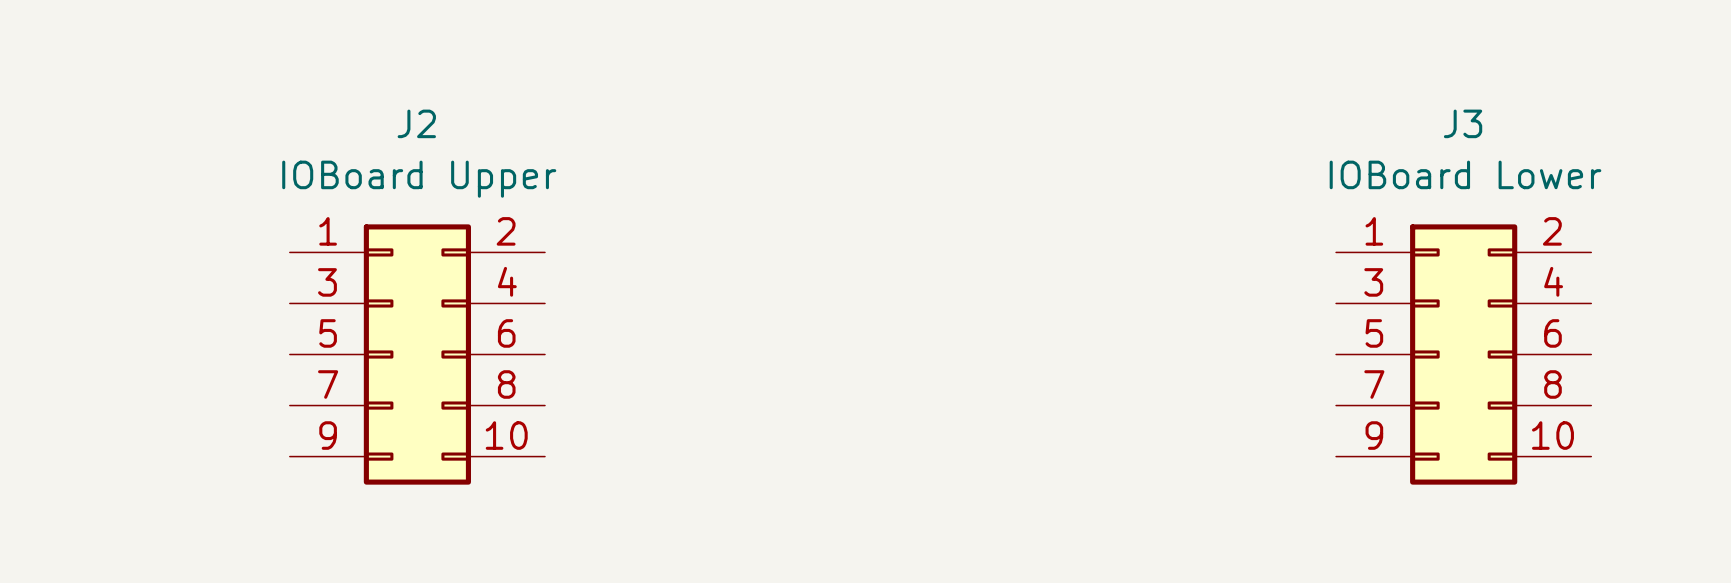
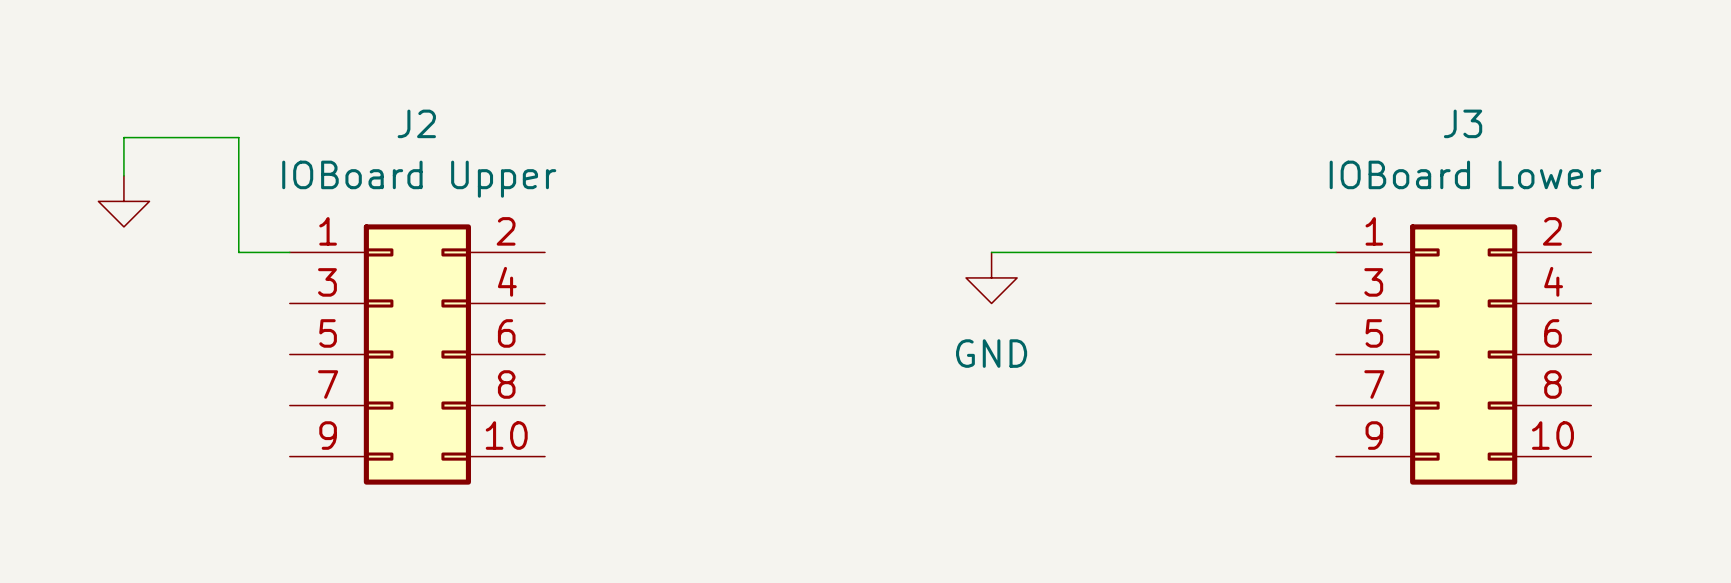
wire: none -> (123, 175) (123, 137) (238, 137) (238, 252) (289, 252)
power symbol: none -> (123, 201)
wire: none -> (991, 252) (1336, 252)
power symbol: none -> GND (991, 277)

